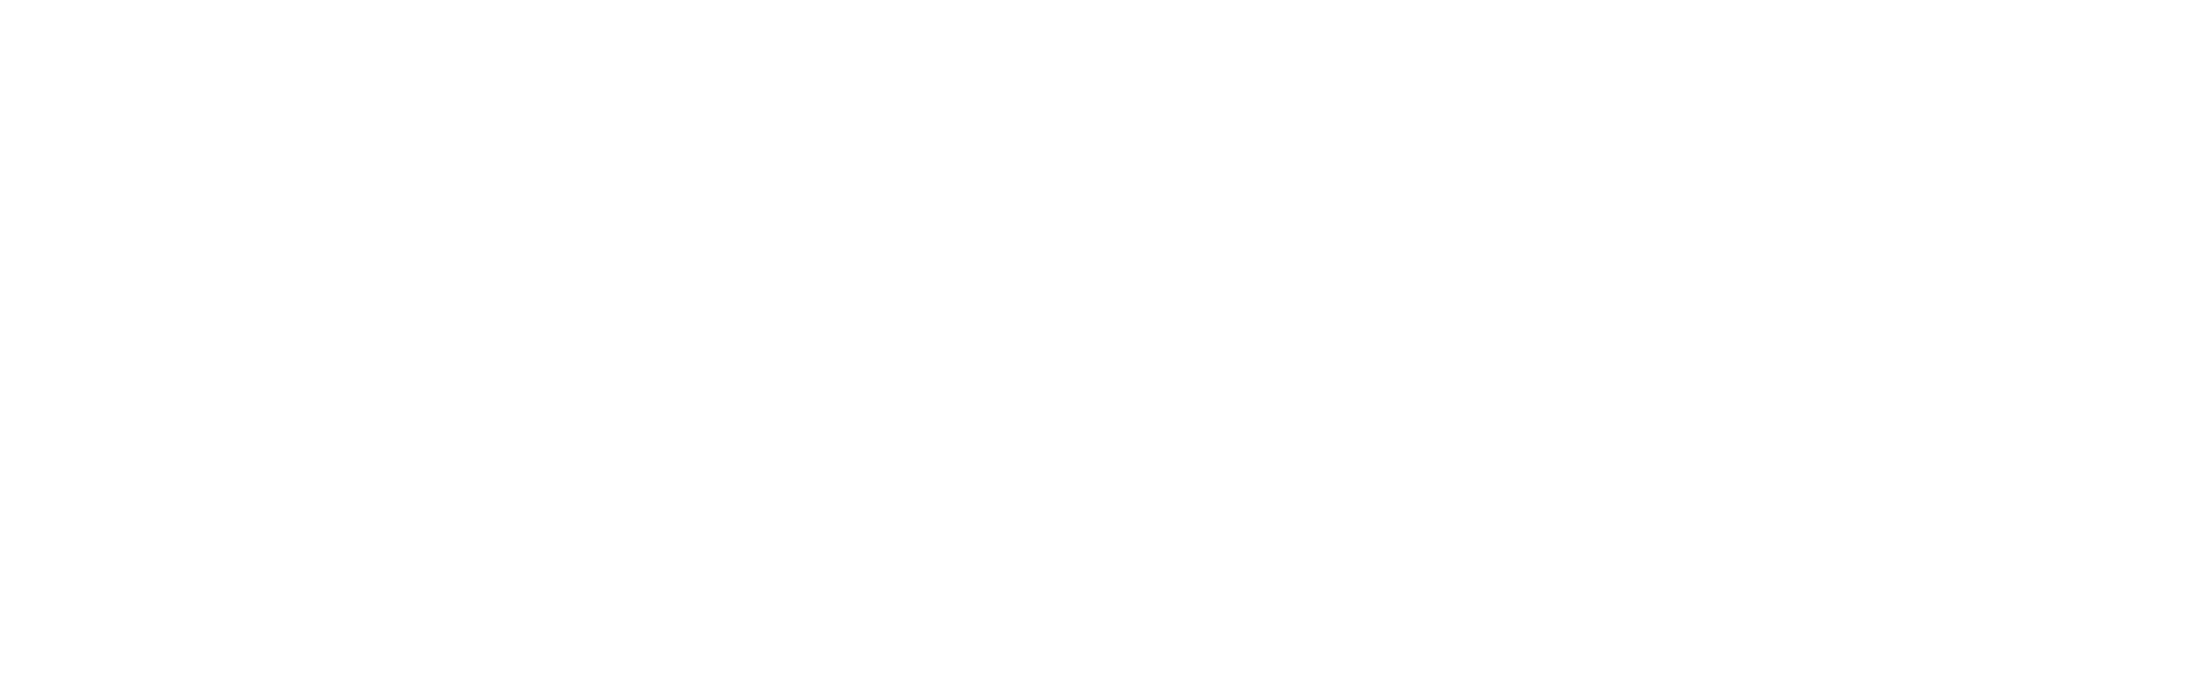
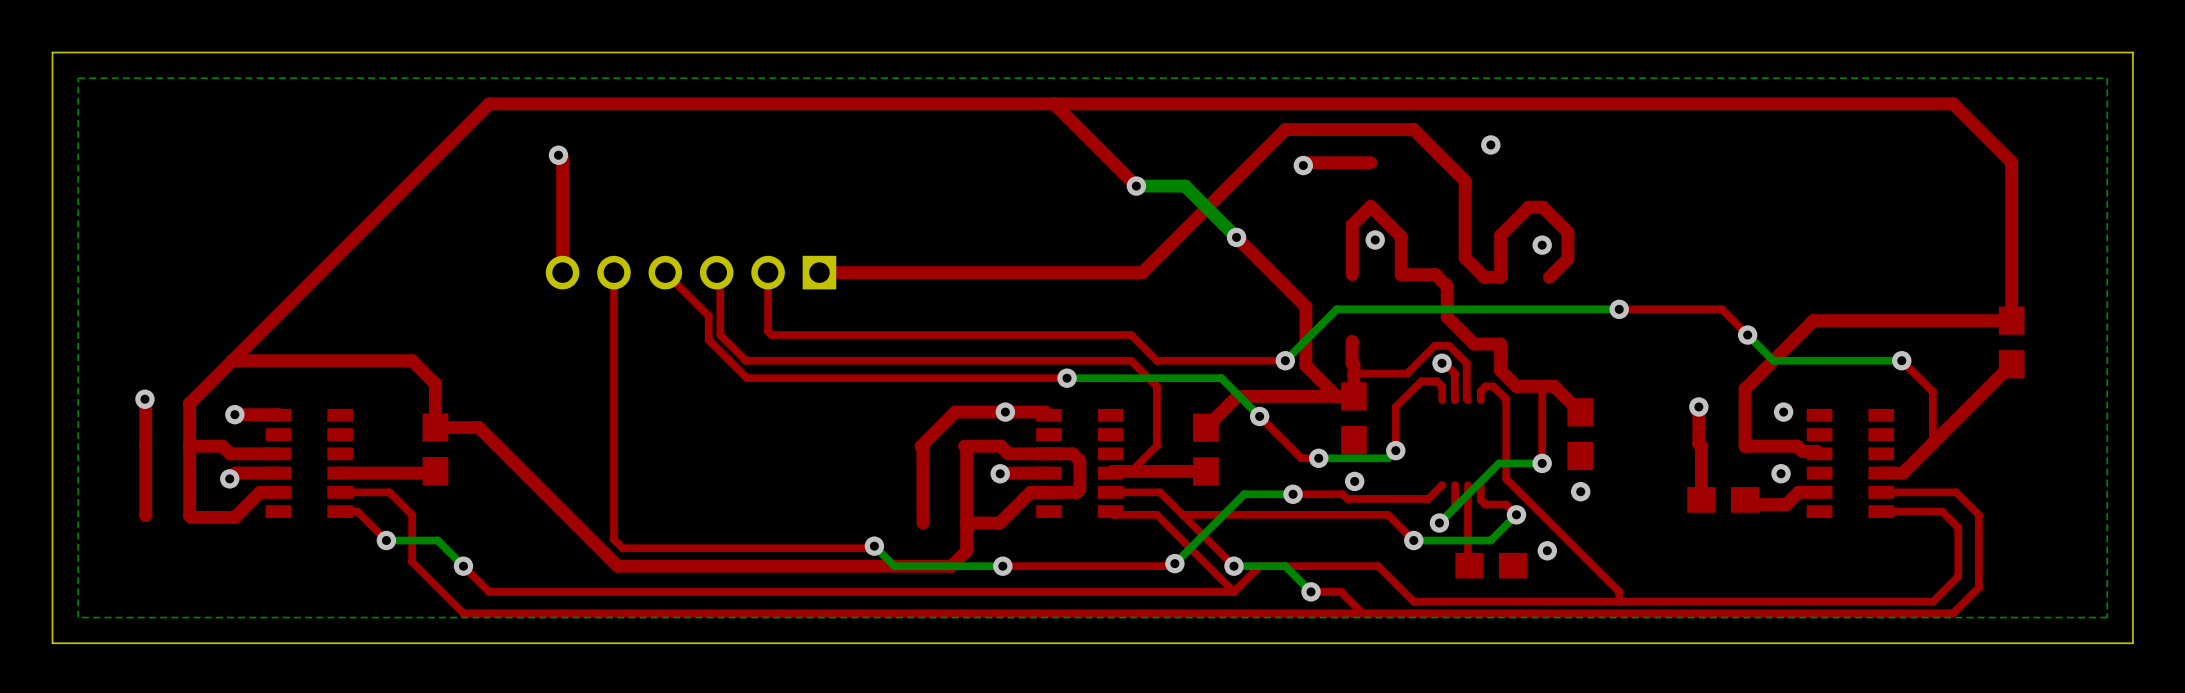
board edge: none -> (2132, 52) (52, 52) (52, 643) (2132, 643) (2132, 52)
bottom zone outline: none -> (2107, 78) (2107, 617) (78, 617) (78, 78) (2107, 78)
top track: none -> (1054, 103) (1136, 186)
via: none -> (1490, 144)
top track: none -> (558, 155) (562, 159) (562, 272)
via: none -> (558, 155)
top track: none -> (1370, 162) (1306, 162) (1303, 165)
via: none -> (1303, 165)
bottom track: none -> (1136, 186) (1185, 186) (1236, 237)
via: none -> (1136, 186)
top track: none -> (1236, 237) (1305, 306) (1305, 365) (1336, 396)
via: none -> (1236, 237)
via: none -> (1375, 240)
via: none -> (1542, 245)
top track: none -> (613, 272) (613, 539) (622, 548) (872, 548) (874, 546)
top track: none -> (665, 272) (708, 315) (708, 339) (747, 378) (1067, 378)
part: none -> (691, 272)
top track: none -> (716, 272) (720, 276) (720, 335) (745, 360) (1131, 360) (1156, 386) (1156, 445) (1131, 471)
top track: none -> (768, 272) (768, 331) (771, 335) (1131, 335) (1156, 360) (1285, 360)
top track: none -> (819, 272) (1142, 272) (1285, 129) (1413, 129) (1465, 180) (1465, 257) (1484, 277) (1500, 277) (1500, 235) (1528, 207) (1542, 207) (1567, 232) (1567, 258) (1549, 277)
top track: none -> (1352, 274) (1352, 224) (1370, 206) (1401, 236) (1401, 274) (1435, 274) (1447, 286) (1447, 317) (1474, 344) (1500, 344) (1500, 370) (1516, 386) (1554, 386) (1580, 412)
top track: none -> (1619, 309) (1721, 309) (1747, 335)
bottom track: none -> (1619, 309) (1336, 309) (1285, 360)
via: none -> (1619, 309)
bottom track: none -> (1747, 335) (1773, 360) (1901, 360)
via: none -> (1747, 335)
top track: none -> (1352, 341) (1353, 396) (1237, 396) (1205, 427)
part: none -> (2011, 342)
top track: none -> (232, 360) (412, 360) (435, 384) (435, 427) (478, 427) (617, 566) (951, 566) (966, 551) (966, 448) (964, 446) (1001, 446) (1008, 453) (1072, 453) (1079, 460) (1079, 489) (1076, 492) (1030, 492) (999, 523) (966, 523)
via: none -> (1285, 360)
top track: none -> (1901, 360) (1932, 391) (1932, 443)
via: none -> (1901, 360)
top track: none -> (1442, 363) (1444, 363) (1454, 373) (1454, 400)
via: none -> (1442, 363)
top track: none -> (2011, 364) (1902, 473) (1881, 473)
top track: none -> (1353, 373) (1407, 373) (1434, 345) (1449, 345) (1466, 363) (1467, 400)
bottom track: none -> (1067, 378) (1221, 378) (1259, 416)
via: none -> (1067, 378)
top track: none -> (1542, 386) (1542, 463)
top track: none -> (144, 399) (145, 515)
via: none -> (144, 399)
top track: none -> (1442, 400) (1442, 386) (1436, 381) (1421, 381) (1395, 406) (1395, 450)
top track: none -> (1480, 400) (1480, 391) (1485, 386) (1493, 386) (1506, 399) (1506, 478) (1619, 591) (1619, 601)
top track: none -> (1698, 406) (1701, 499)
via: none -> (1698, 406)
via: none -> (1005, 412)
via: none -> (1783, 412)
top track: none -> (234, 414) (278, 415)
via: none -> (234, 414)
top track: none -> (1049, 415) (1045, 412) (955, 412) (921, 446) (922, 448) (922, 523)
top track: none -> (1259, 416) (1301, 458) (1318, 458)
via: none -> (1259, 416)
part: none -> (1353, 418)
part: none -> (1580, 434)
top track: none -> (189, 446) (222, 446) (230, 453) (278, 453)
part: none -> (435, 449)
part: none -> (1205, 449)
bottom track: none -> (1395, 450) (1388, 458) (1318, 458)
via: none -> (1395, 450)
top track: none -> (1819, 453) (1817, 451) (1802, 451) (1797, 446) (1745, 446) (1745, 388) (1813, 320) (2011, 320) (2011, 162) (1953, 103) (489, 103) (189, 403) (189, 515) (191, 517) (234, 517) (259, 492) (278, 492)
via: none -> (1318, 458)
part: none -> (309, 463)
part: none -> (1079, 463)
bottom track: none -> (1542, 463) (1499, 463) (1439, 523)
via: none -> (1542, 463)
part: none -> (1850, 463)
top track: none -> (435, 471) (433, 473) (340, 473)
top track: none -> (1205, 471) (1112, 471) (1110, 473)
top track: none -> (278, 473) (235, 473) (229, 478)
via: none -> (1000, 473)
top track: none -> (1049, 473) (1000, 473)
via: none -> (1781, 473)
via: none -> (229, 478)
via: none -> (1354, 481)
top track: none -> (1442, 485) (1428, 498) (1347, 498) (1342, 494) (1293, 494)
top track: none -> (1455, 485) (1455, 507) (1439, 523)
top track: none -> (1467, 485) (1467, 564) (1469, 565)
top track: none -> (1480, 485) (1480, 499) (1485, 504) (1506, 504) (1516, 514)
via: none -> (1580, 491)
top track: none -> (1110, 492) (1160, 492) (1233, 566)
top track: none -> (1819, 492) (1798, 492) (1786, 504) (1749, 504) (1745, 499)
top track: none -> (1881, 492) (1956, 492) (1978, 514) (1978, 587) (1953, 613) (463, 613) (412, 561) (412, 514) (389, 492) (340, 492)
bottom track: none -> (1293, 494) (1244, 494) (1174, 563)
via: none -> (1293, 494)
part: none -> (1723, 499)
top track: none -> (340, 511) (357, 511) (386, 540)
top track: none -> (1110, 511) (1113, 514) (1156, 514) (1233, 591)
top track: none -> (1881, 511) (1942, 511) (1958, 527) (1958, 576) (1933, 601) (1413, 601) (1378, 566) (1259, 566) (1233, 591)
top track: none -> (1182, 514) (1388, 514) (1413, 540)
bottom track: none -> (1516, 514) (1490, 540) (1413, 540)
via: none -> (1516, 514)
via: none -> (1439, 523)
bottom track: none -> (386, 540) (437, 540) (463, 566)
via: none -> (386, 540)
via: none -> (1413, 540)
bottom track: none -> (874, 546) (894, 566) (1002, 566)
via: none -> (874, 546)
via: none -> (1547, 550)
top track: none -> (1174, 563) (1172, 566) (1002, 566)
via: none -> (1174, 563)
part: none -> (1491, 565)
top track: none -> (463, 566) (489, 591) (1233, 591)
via: none -> (463, 566)
via: none -> (1002, 566)
bottom track: none -> (1233, 566) (1285, 566) (1311, 591)
via: none -> (1233, 566)
top track: none -> (1311, 591) (1340, 591) (1362, 613)
via: none -> (1311, 591)

